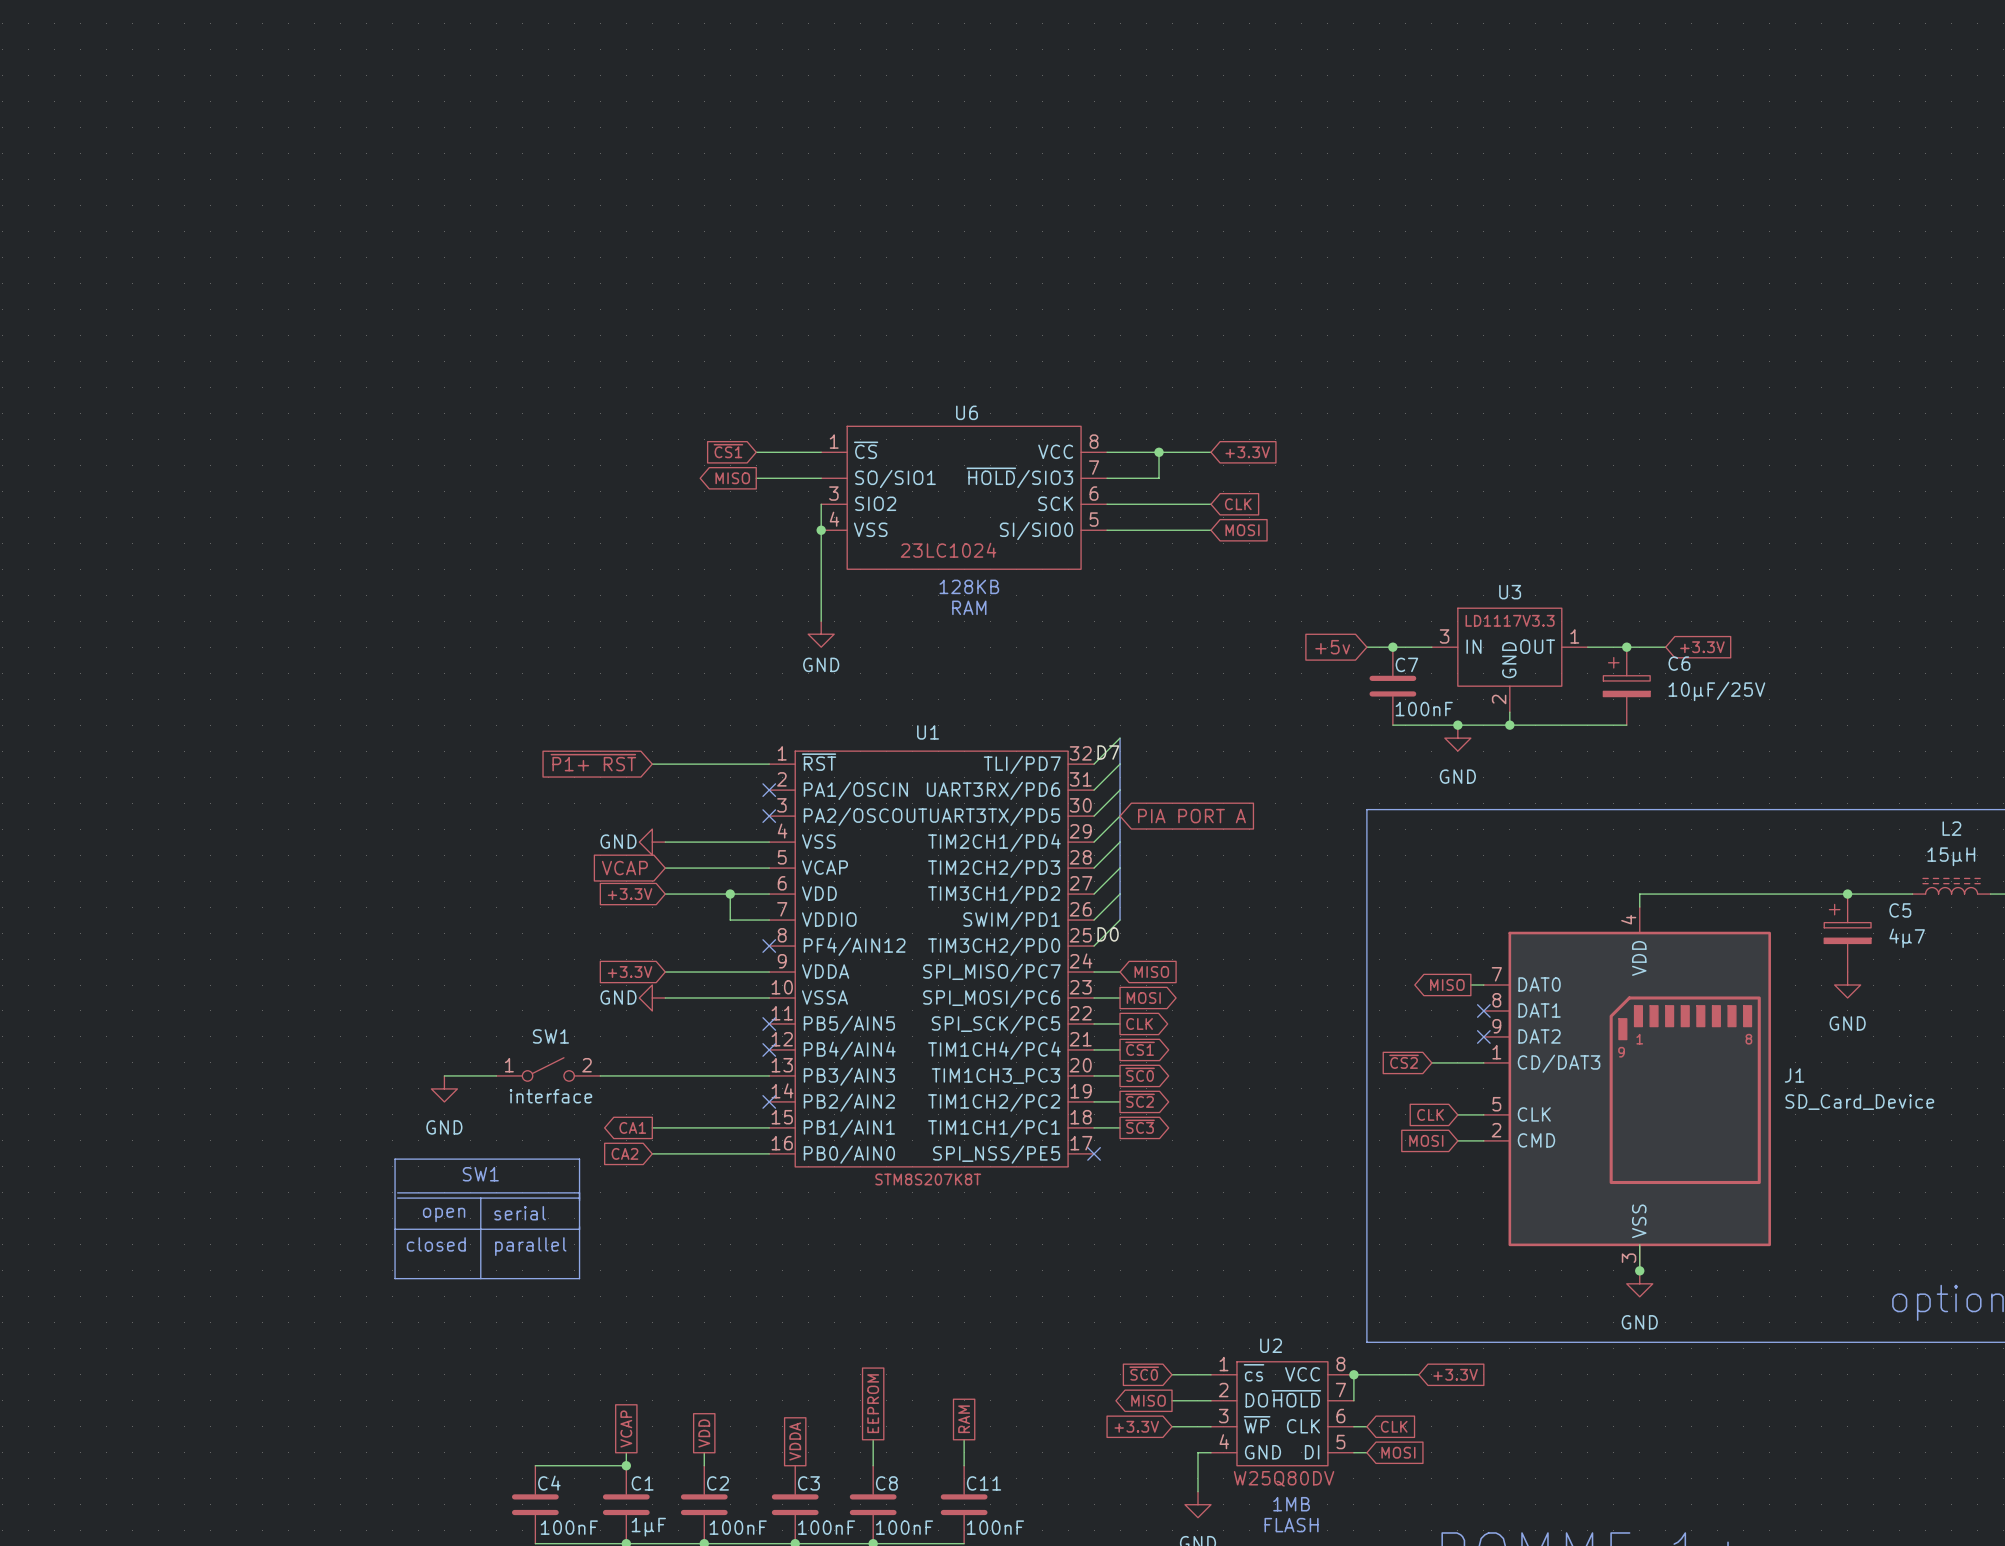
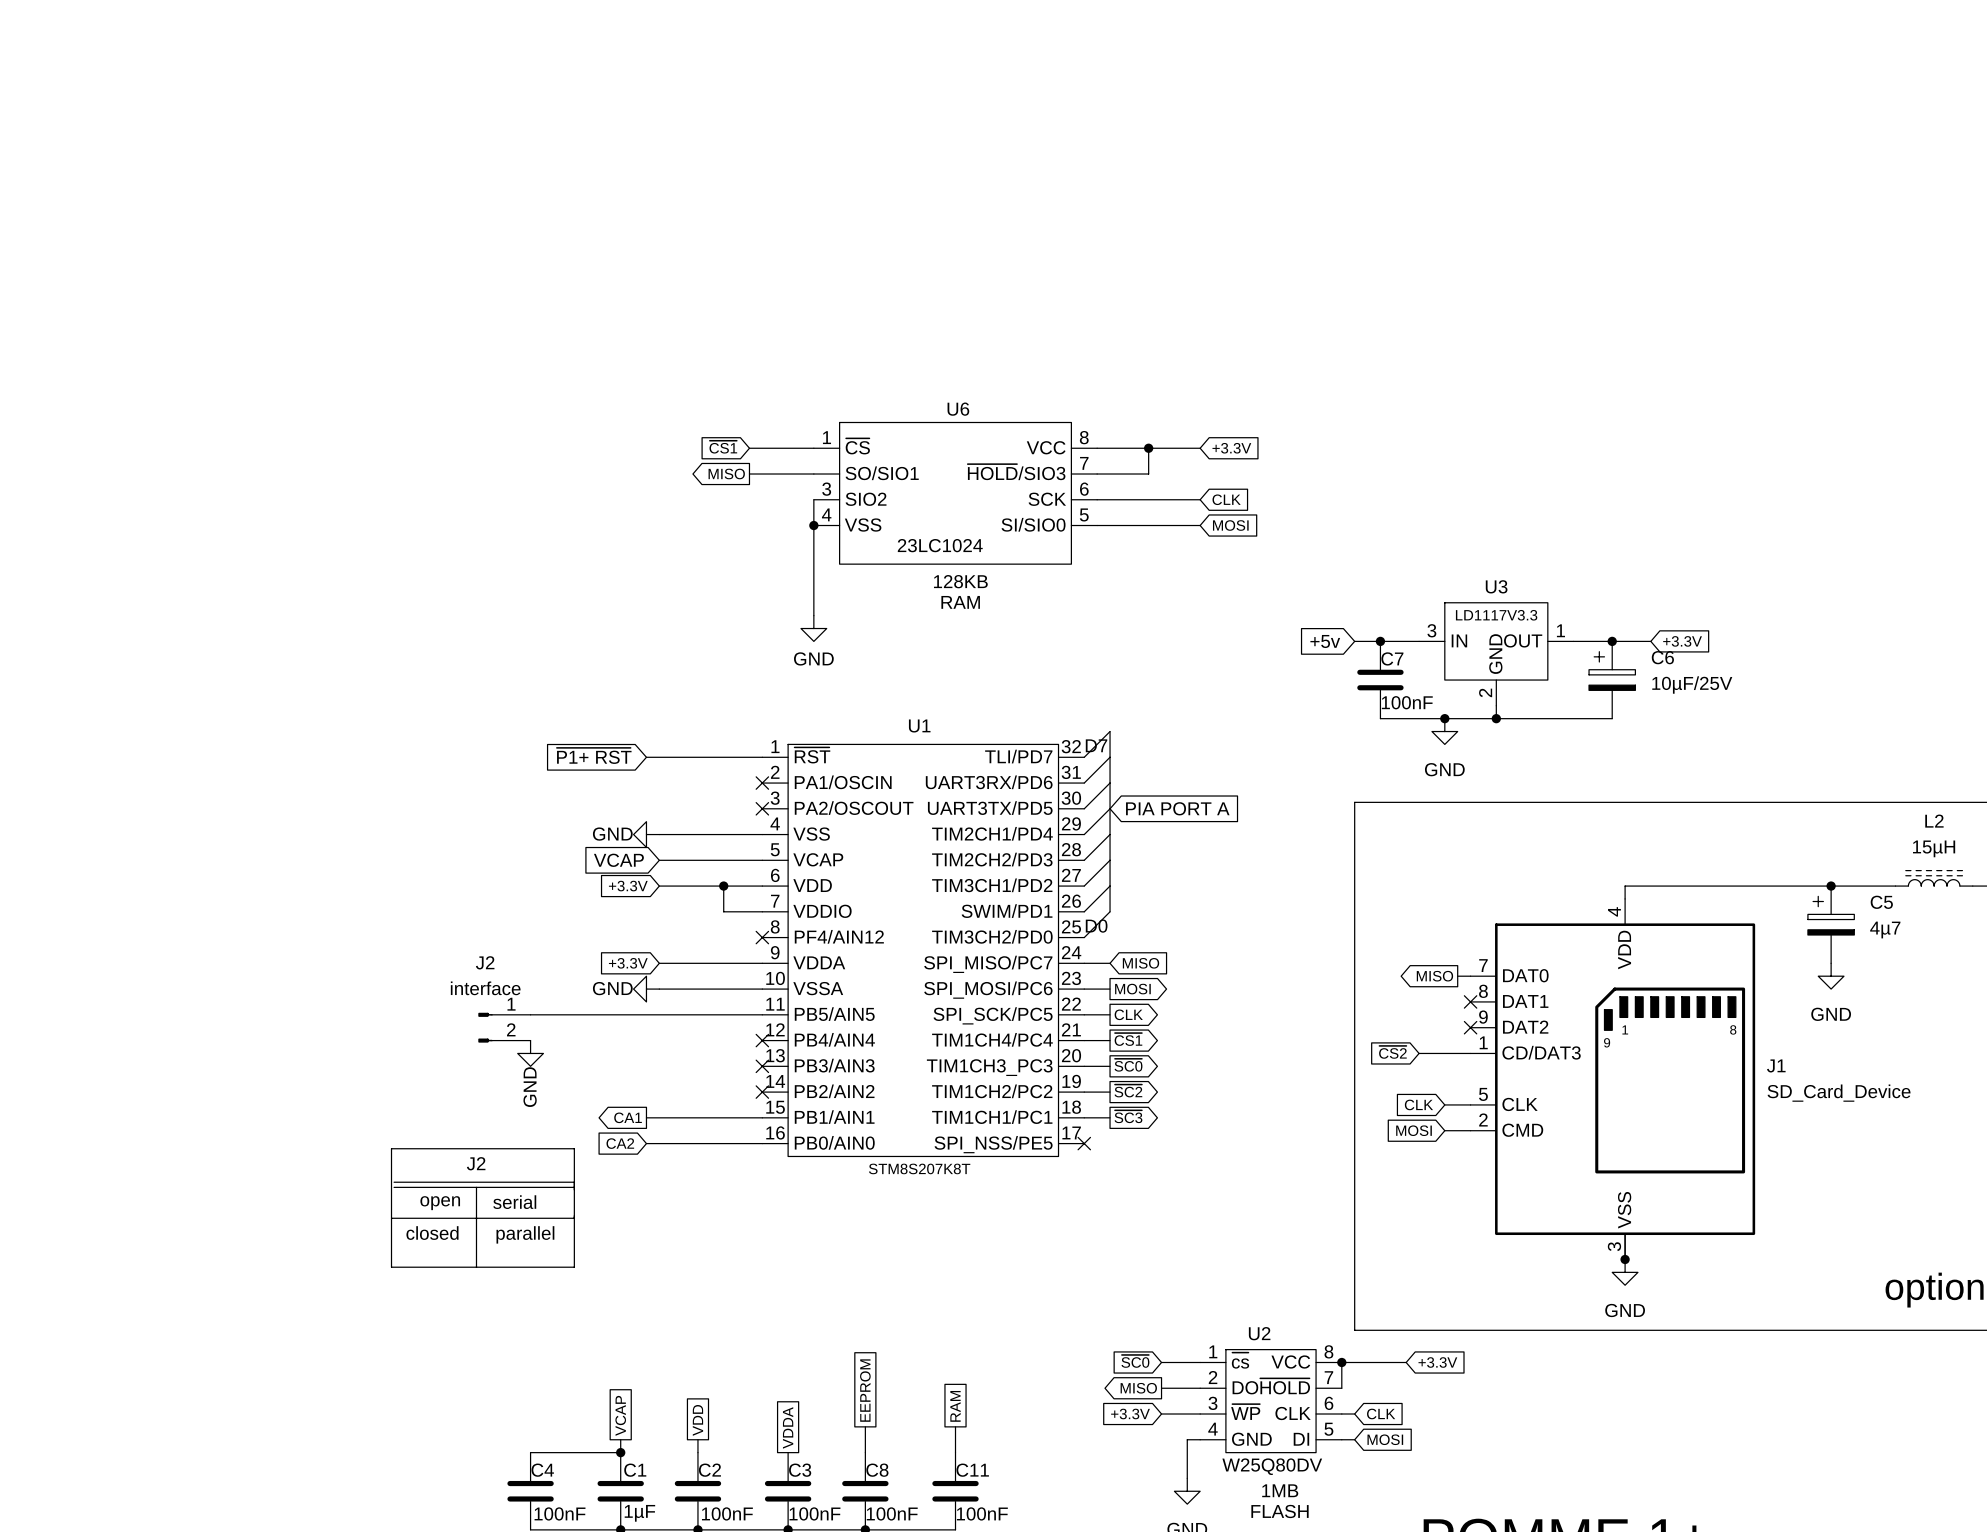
wire: none -> (530, 1014) (762, 1014)
no-connect mark position: (769, 1023) -> (762, 1066)
J2: none -> interface (504, 1027)
SW1: interface (548, 1069) -> none
wire: (444, 1075) (496, 1075) -> none
wire: (600, 1075) (769, 1075) -> none
power symbol position: GND (444, 1088) -> GND (530, 1053)
power symbol text rotation: 0° (444, 1127) -> 90° counterclockwise (530, 1087)
text: SW1 (480, 1174) -> J2 (476, 1163)

